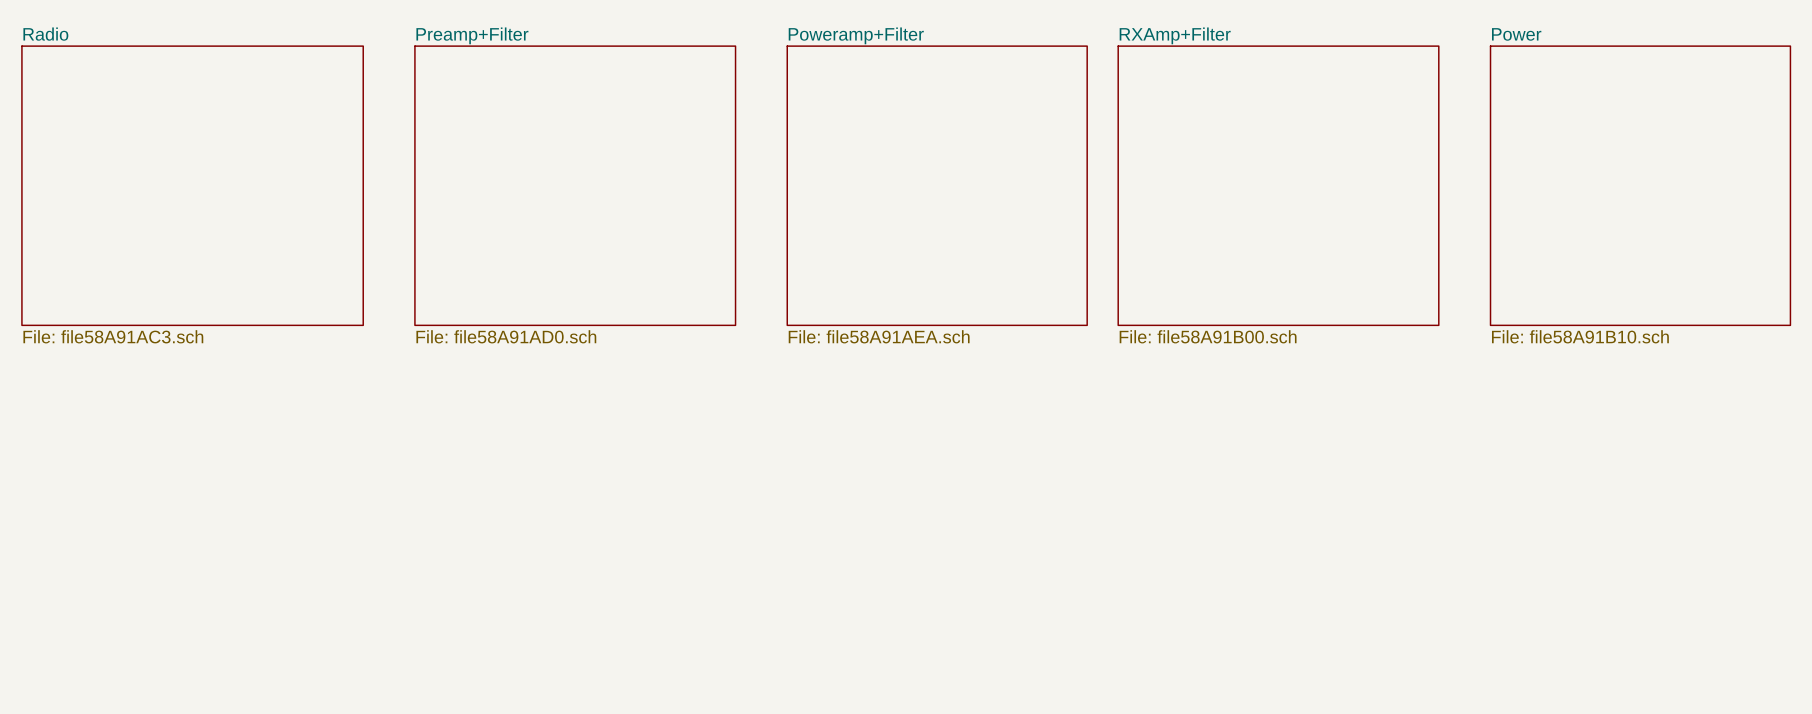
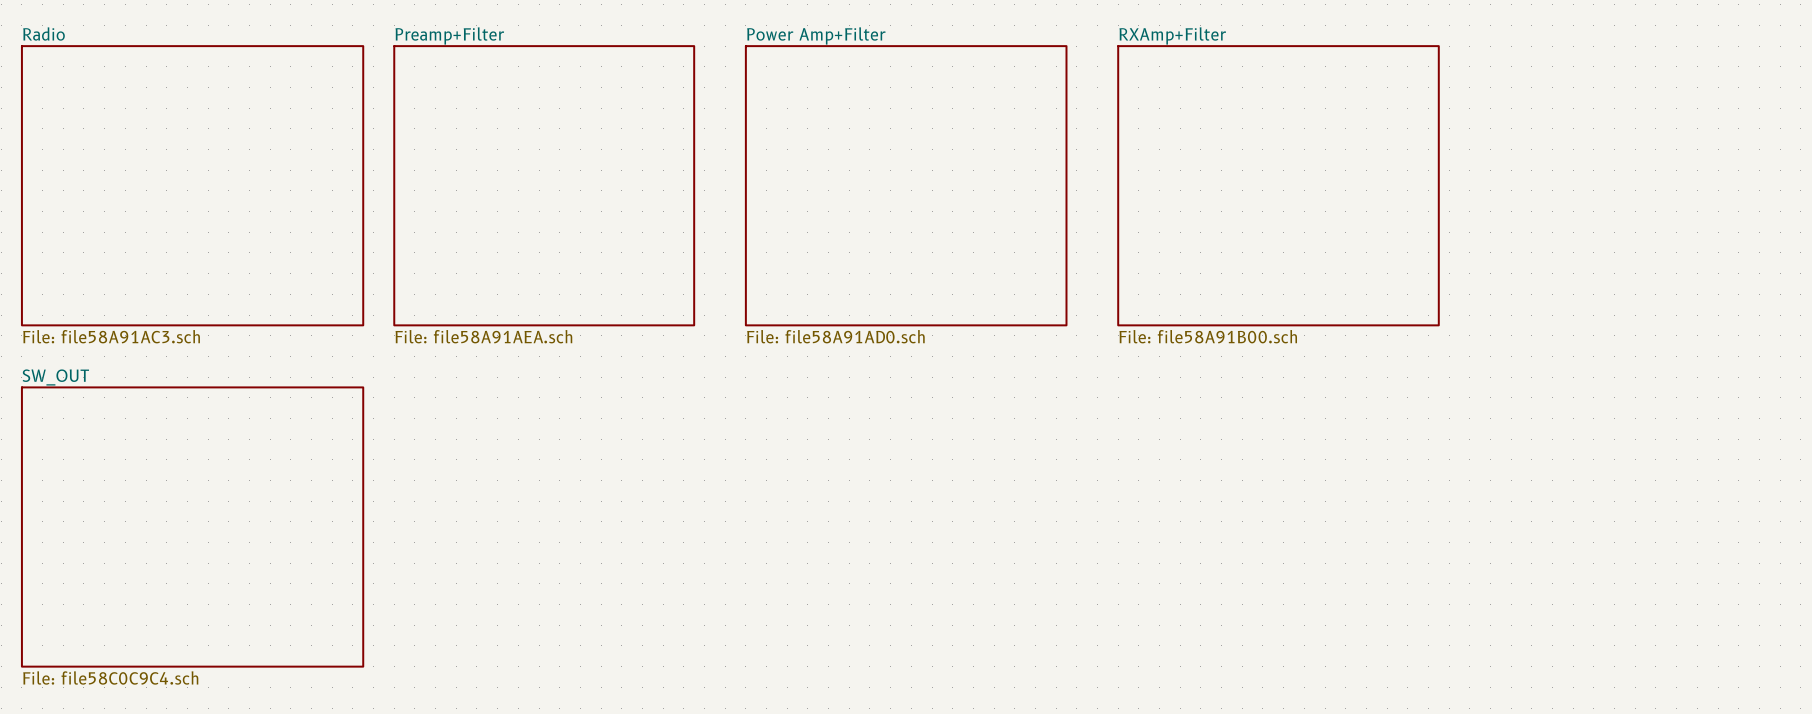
sheet Preamp+Filter: none -> File: file58A91AEA.sch (544, 185)
sheet Preamp+Filter: File: file58A91AD0.sch (575, 185) -> none
sheet Power Amp+Filter: none -> File: file58A91AD0.sch (906, 185)
sheet Poweramp+Filter: File: file58A91AEA.sch (937, 185) -> none
sheet Power: File: file58A91B10.sch (1640, 185) -> none
sheet SW_OUT: none -> File: file58C0C9C4.sch (192, 527)

